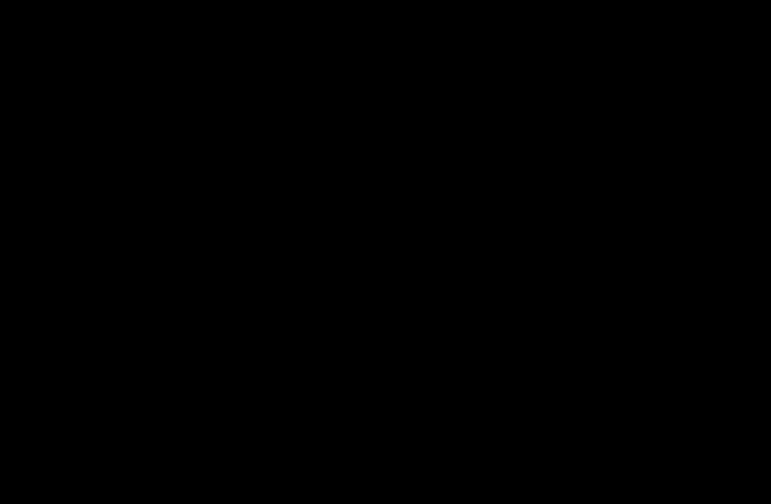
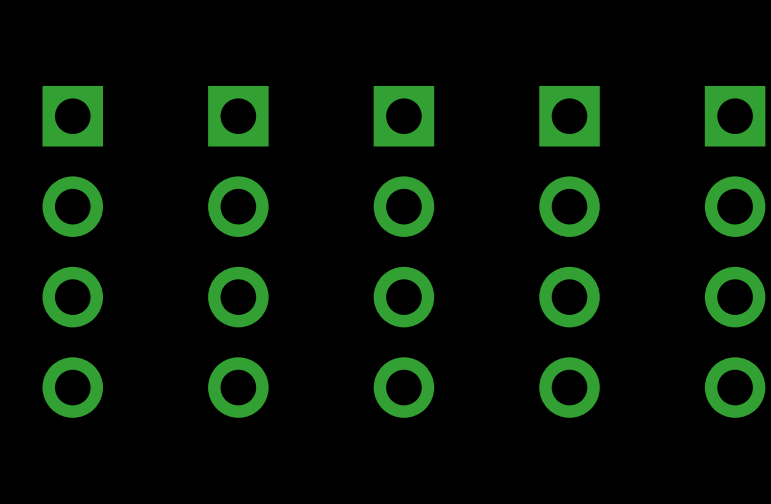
part: none -> (72, 251)
part: none -> (238, 251)
part: none -> (403, 251)
part: none -> (569, 251)
part: none -> (735, 251)

